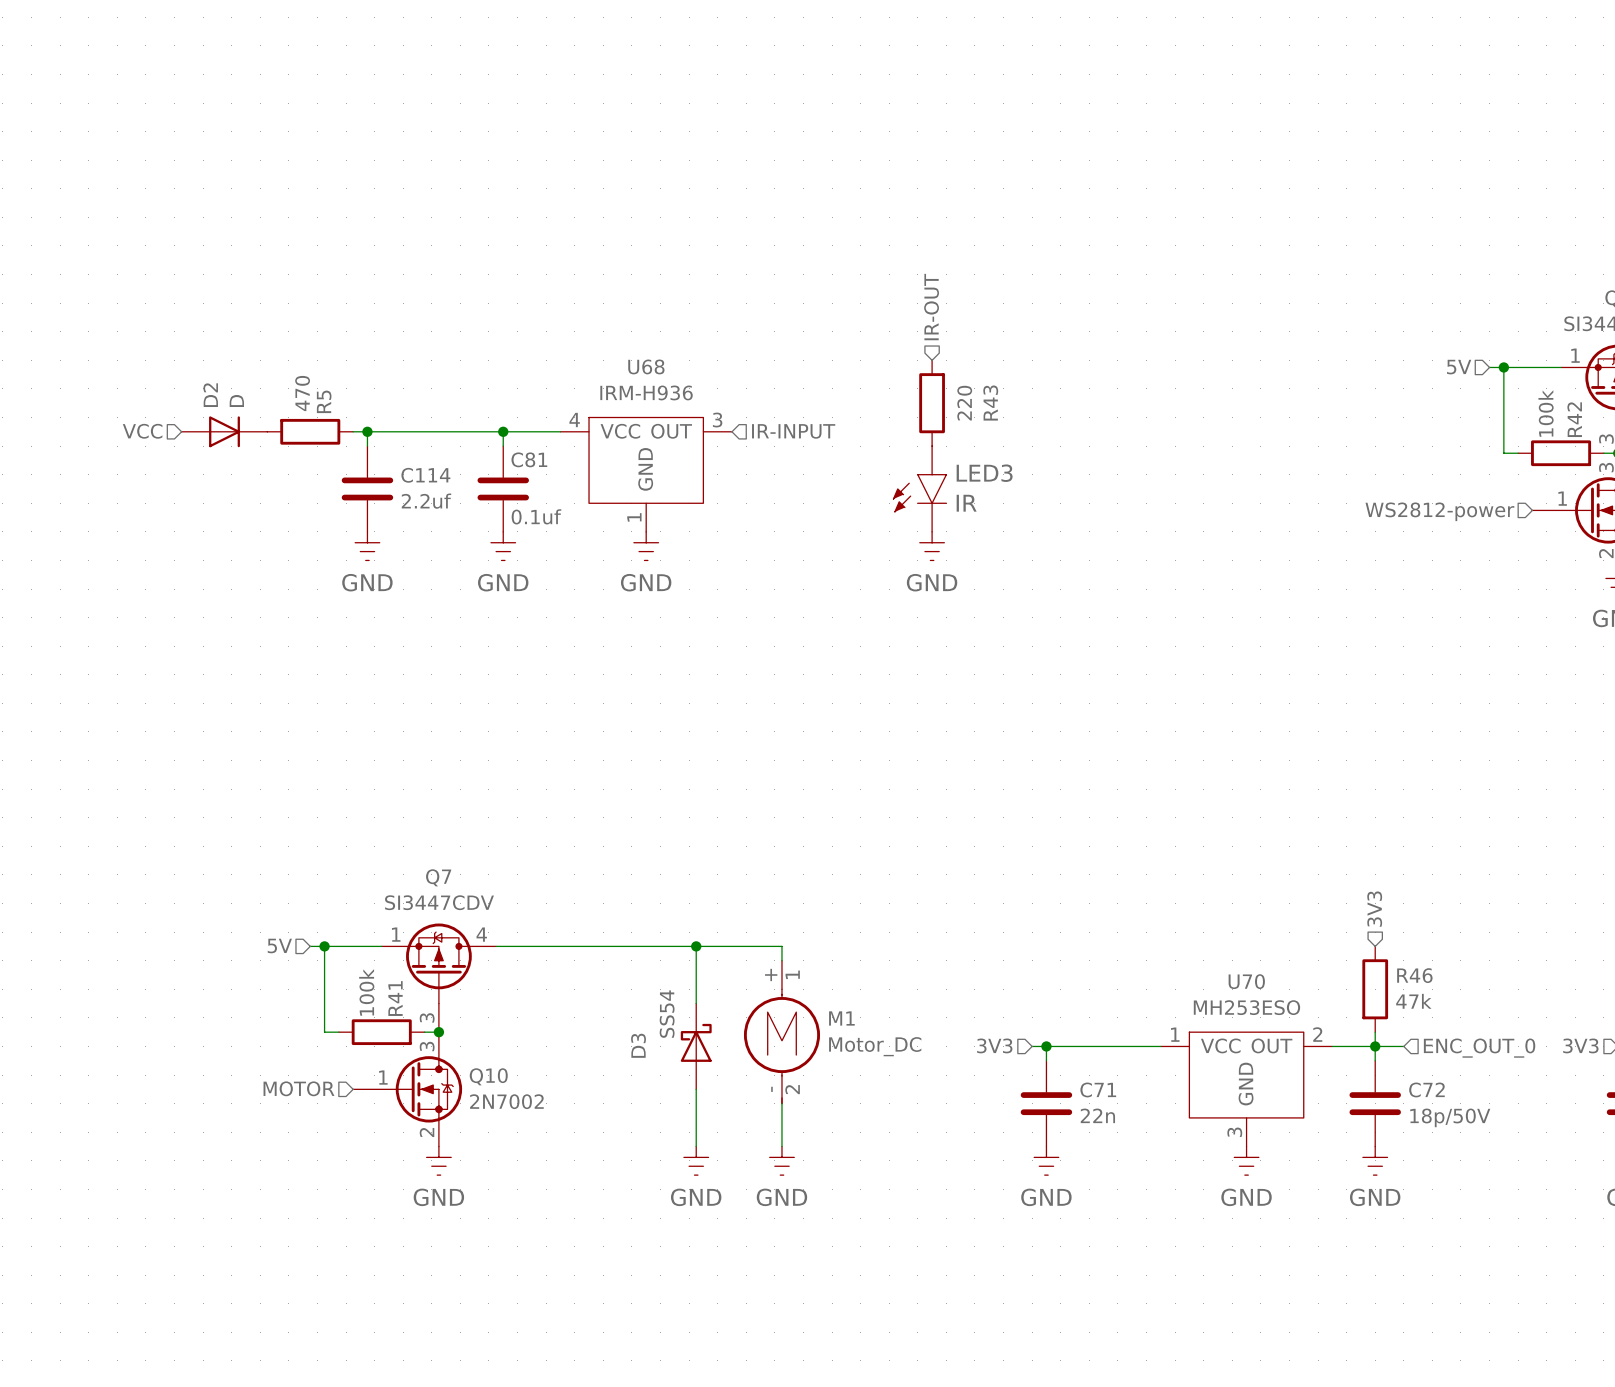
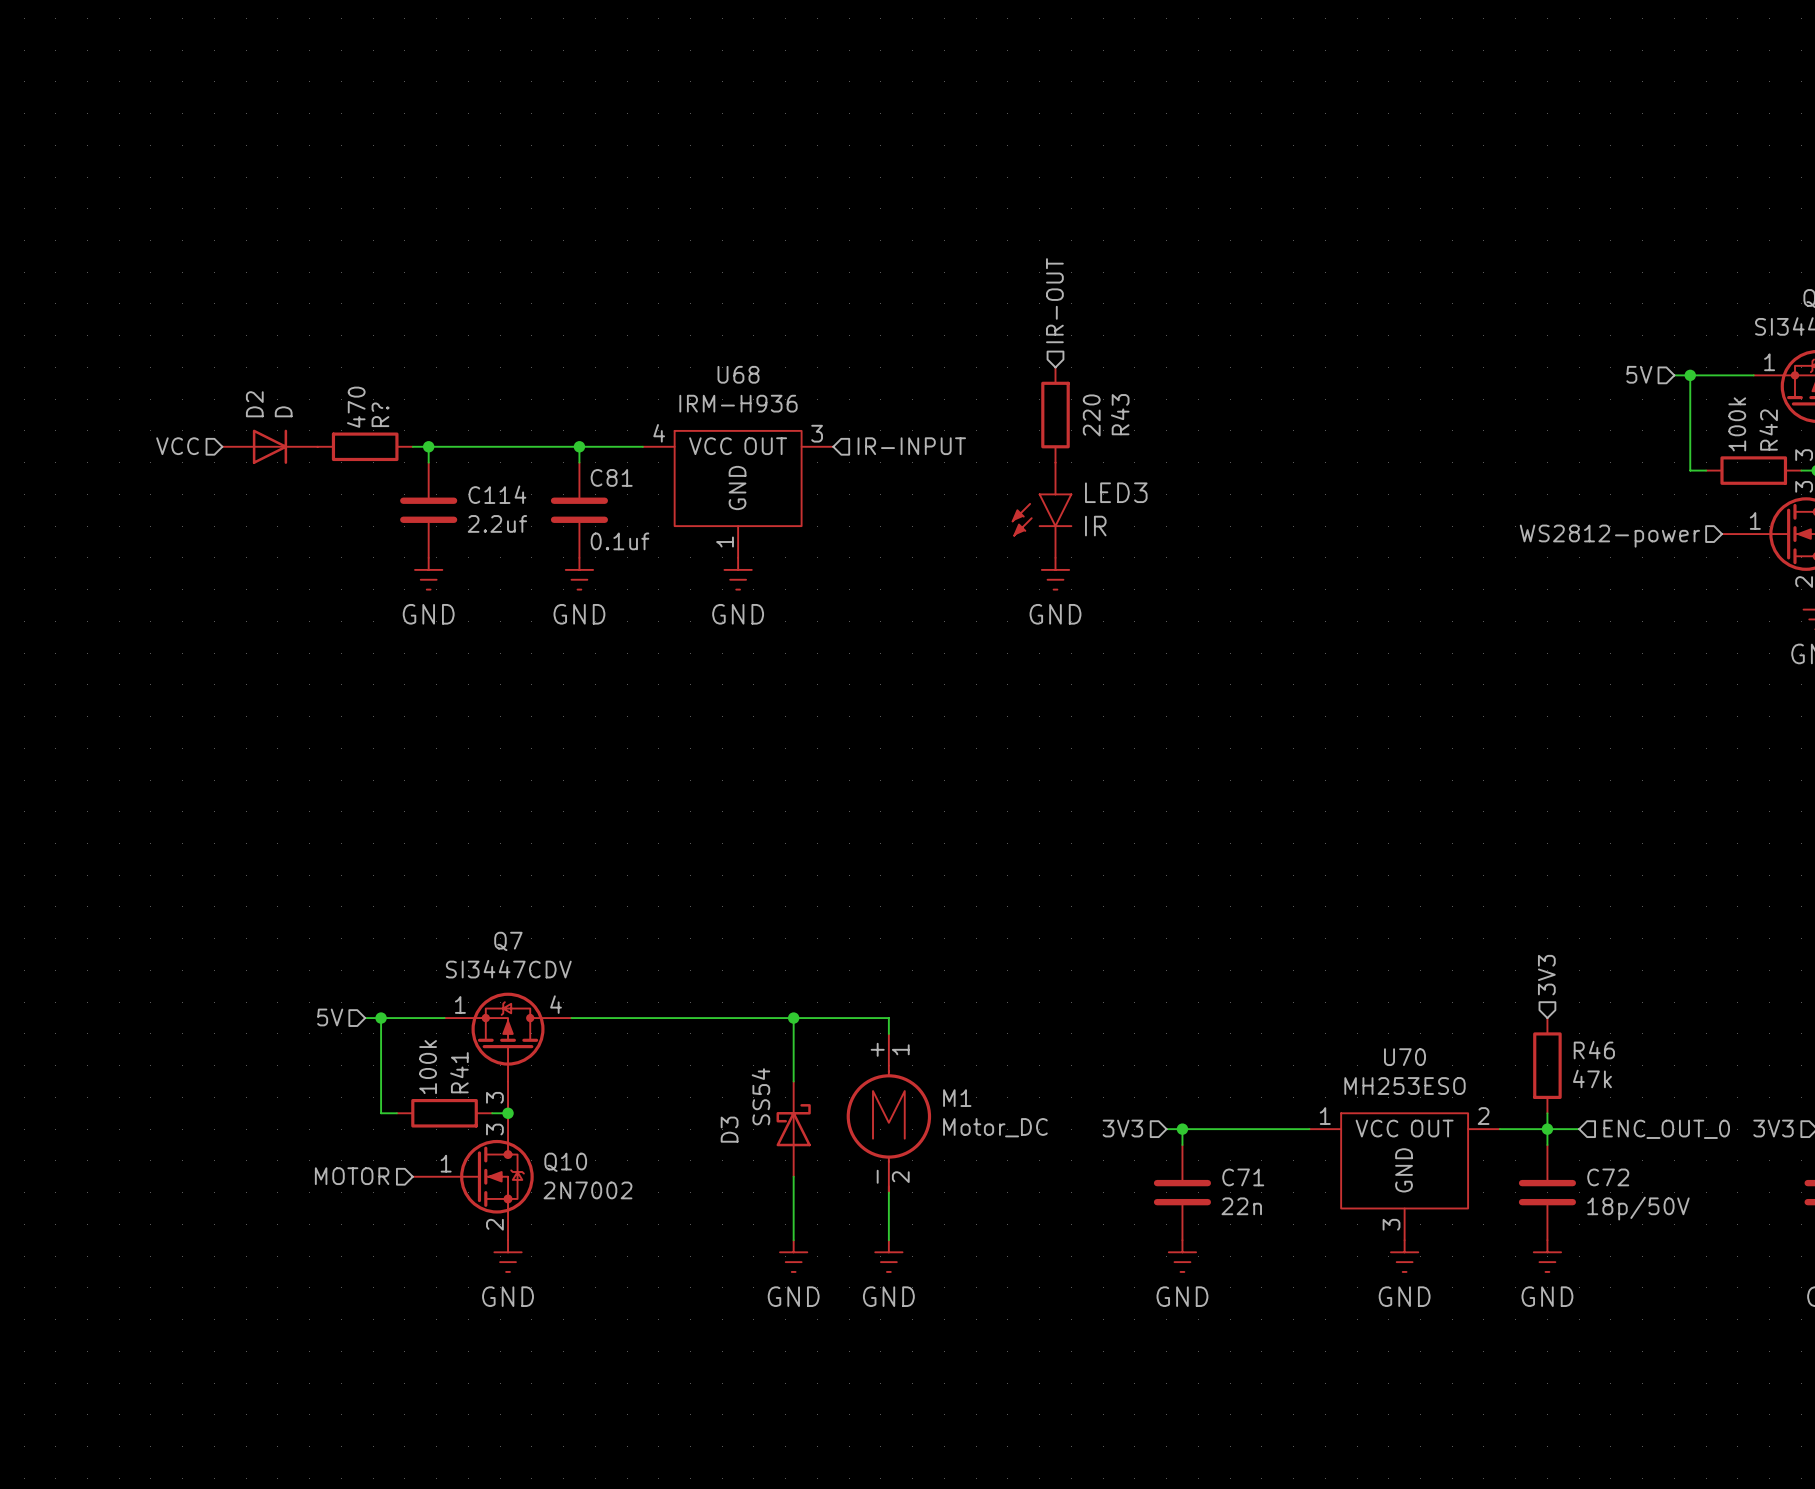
R5 name: R5 (324, 401) -> R? (380, 414)

